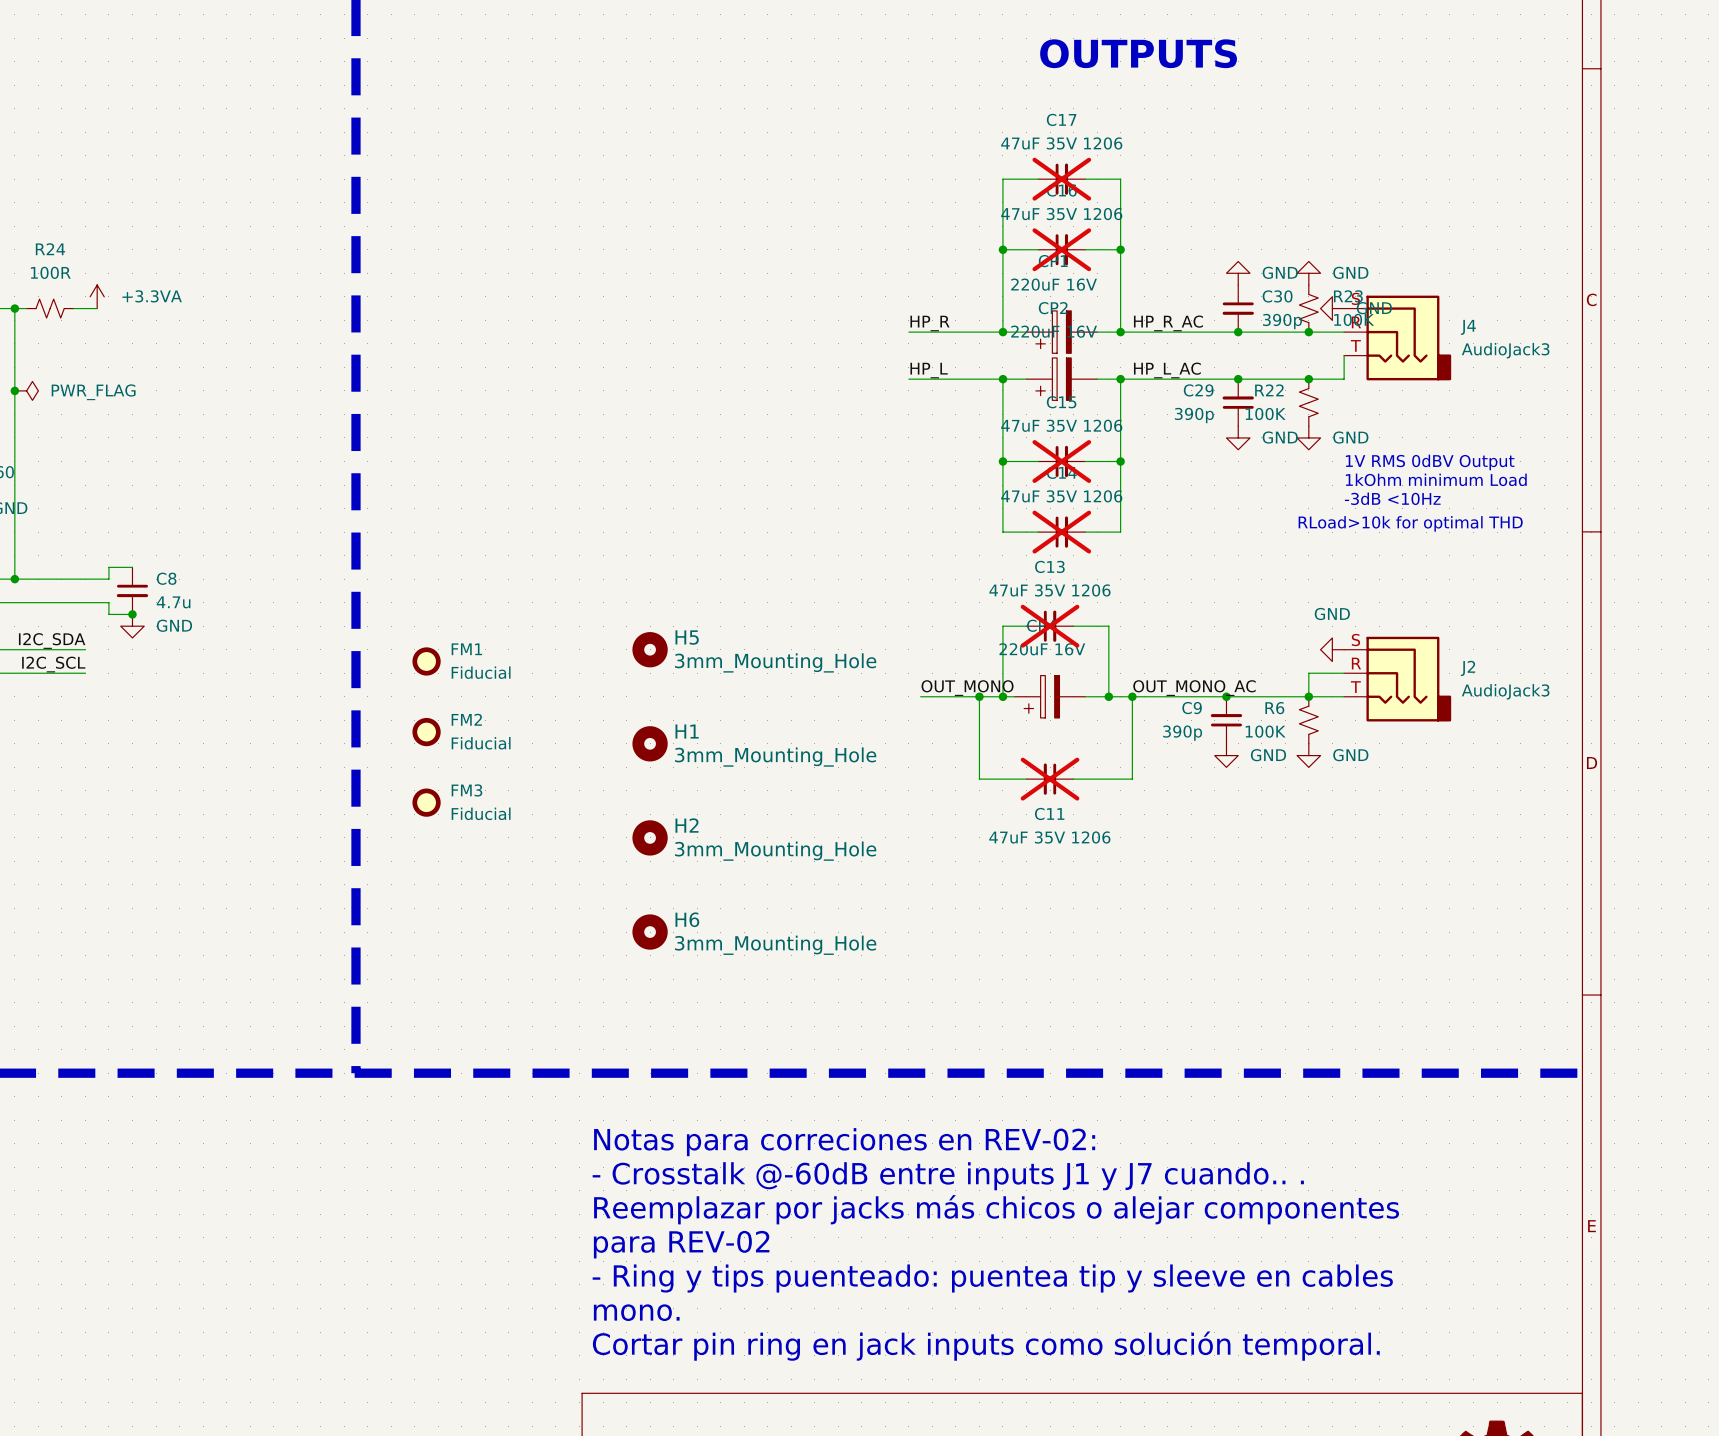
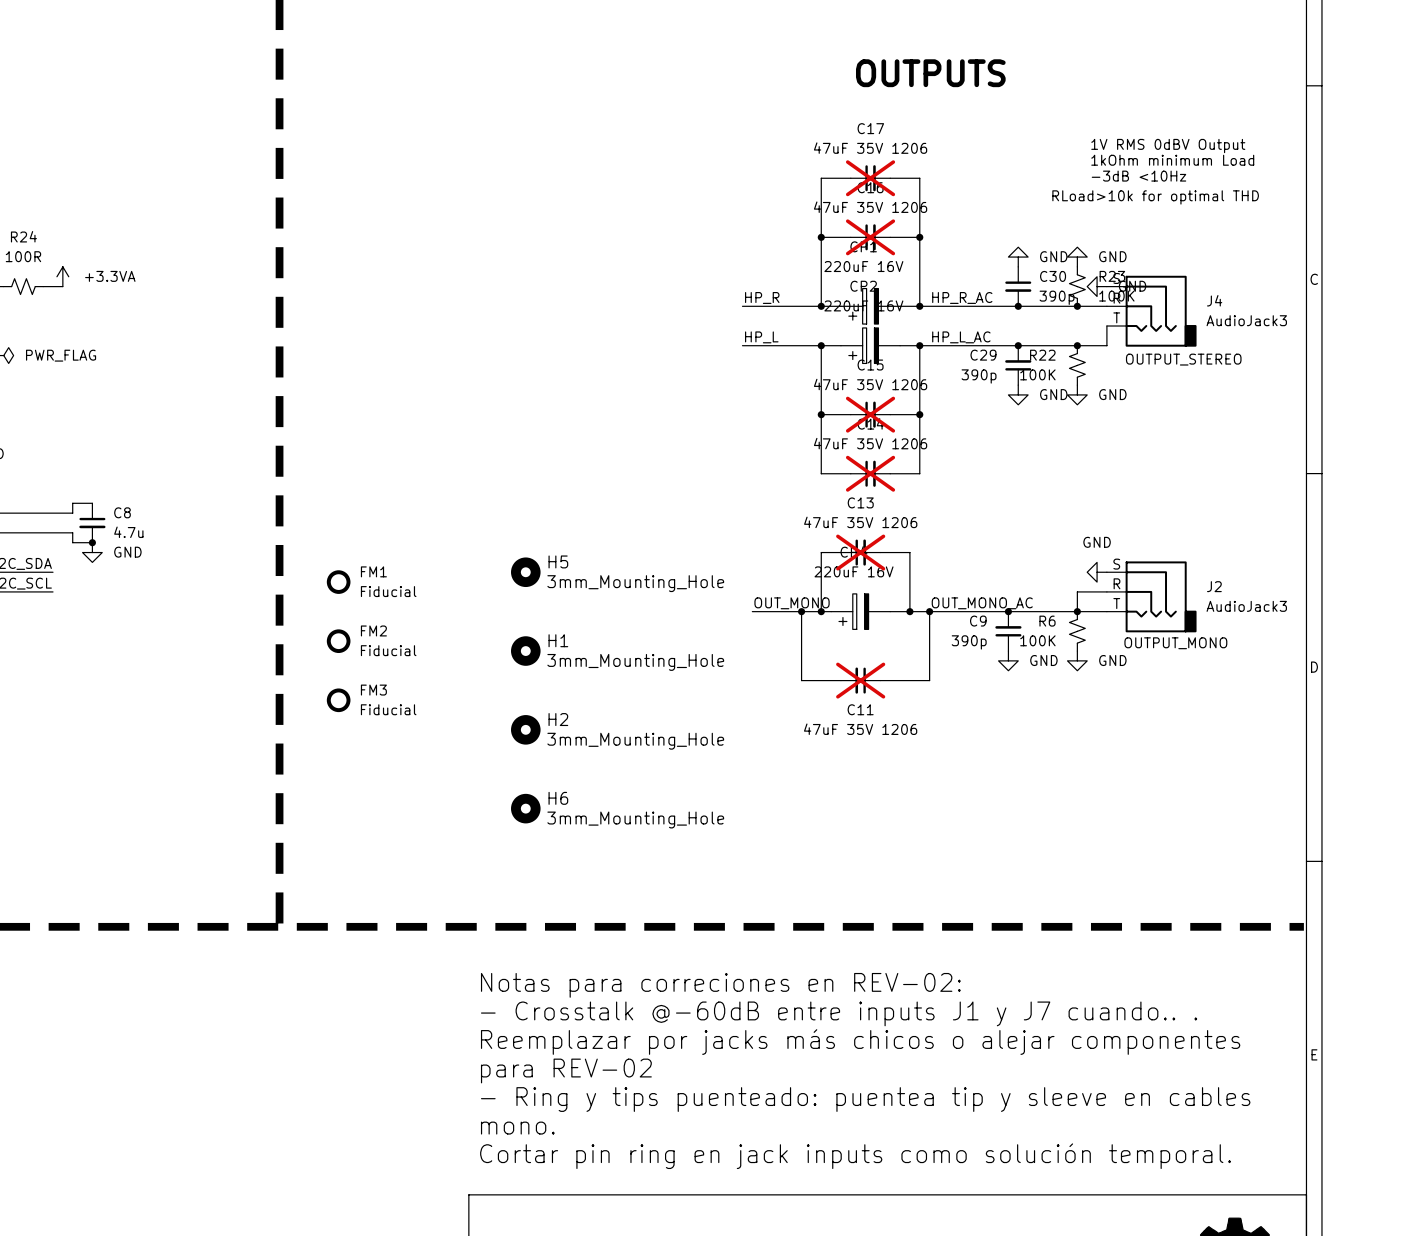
text: none -> 1V RMS 0dBV Output (1168, 146)
text: none -> 1kOhm minimum Load (1172, 160)
text: none -> -3dB <10Hz (1138, 176)
text: none -> RLoad>10k for optimal THD (1155, 197)
J4 text: none -> OUTPUT_STEREO (1183, 359)
text: 1V RMS 0dBV Output (1430, 462) -> none
text: 1kOhm minimum Load (1436, 479) -> none
text: -3dB <10Hz (1392, 498) -> none
text: RLoad>10k for optimal THD (1410, 523) -> none
J2 text: none -> OUTPUT_MONO (1175, 643)

